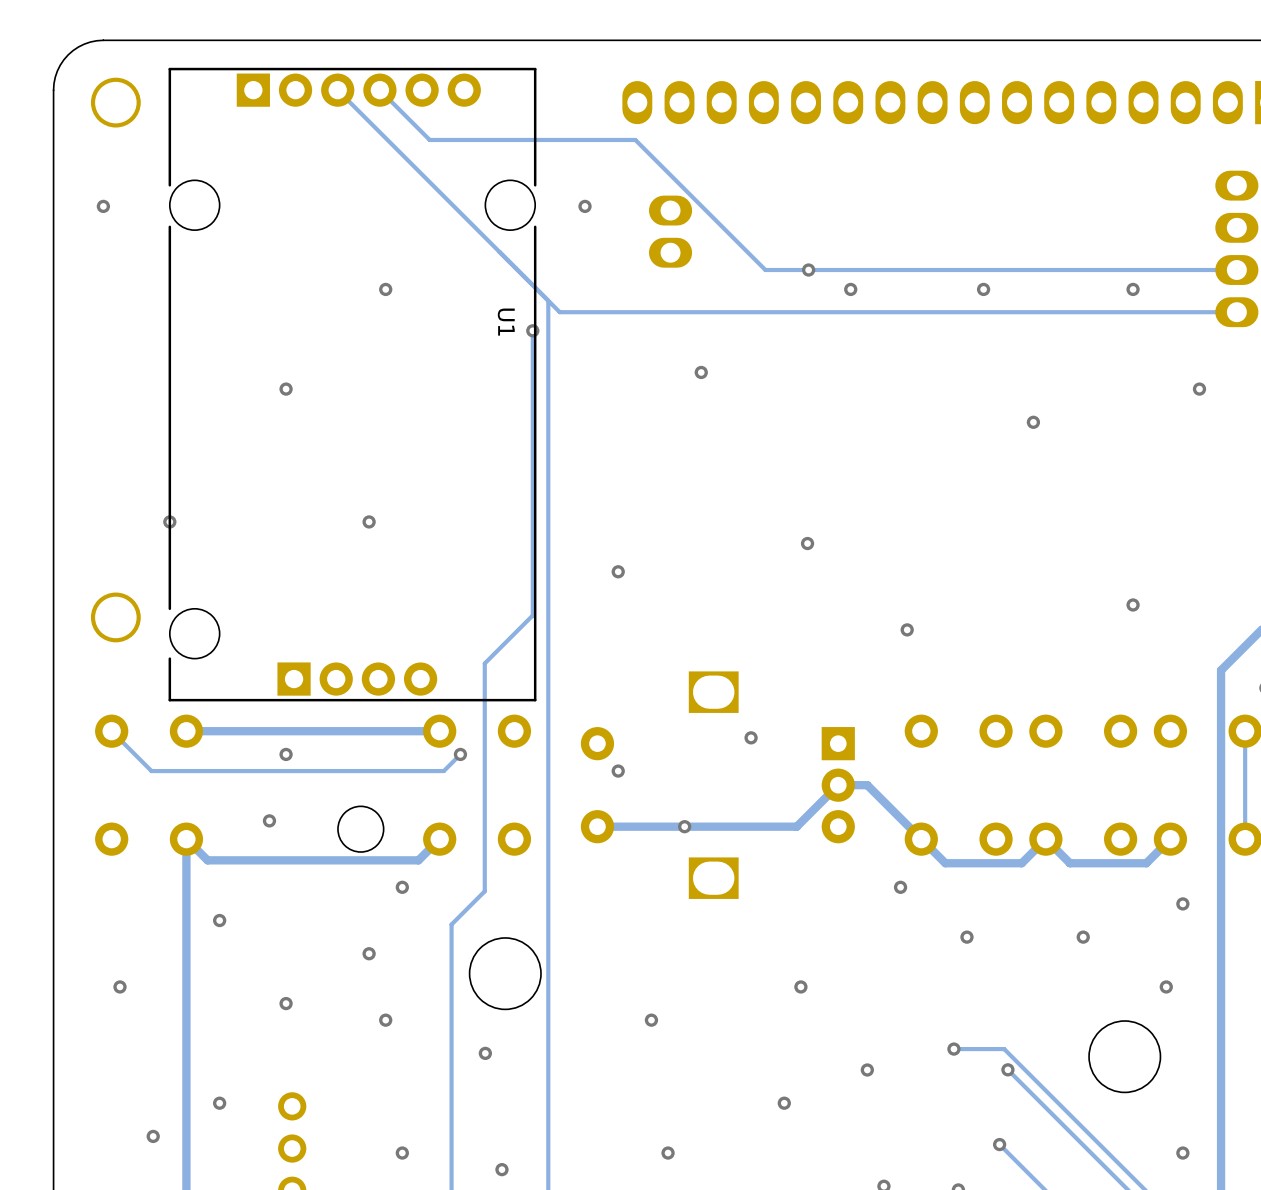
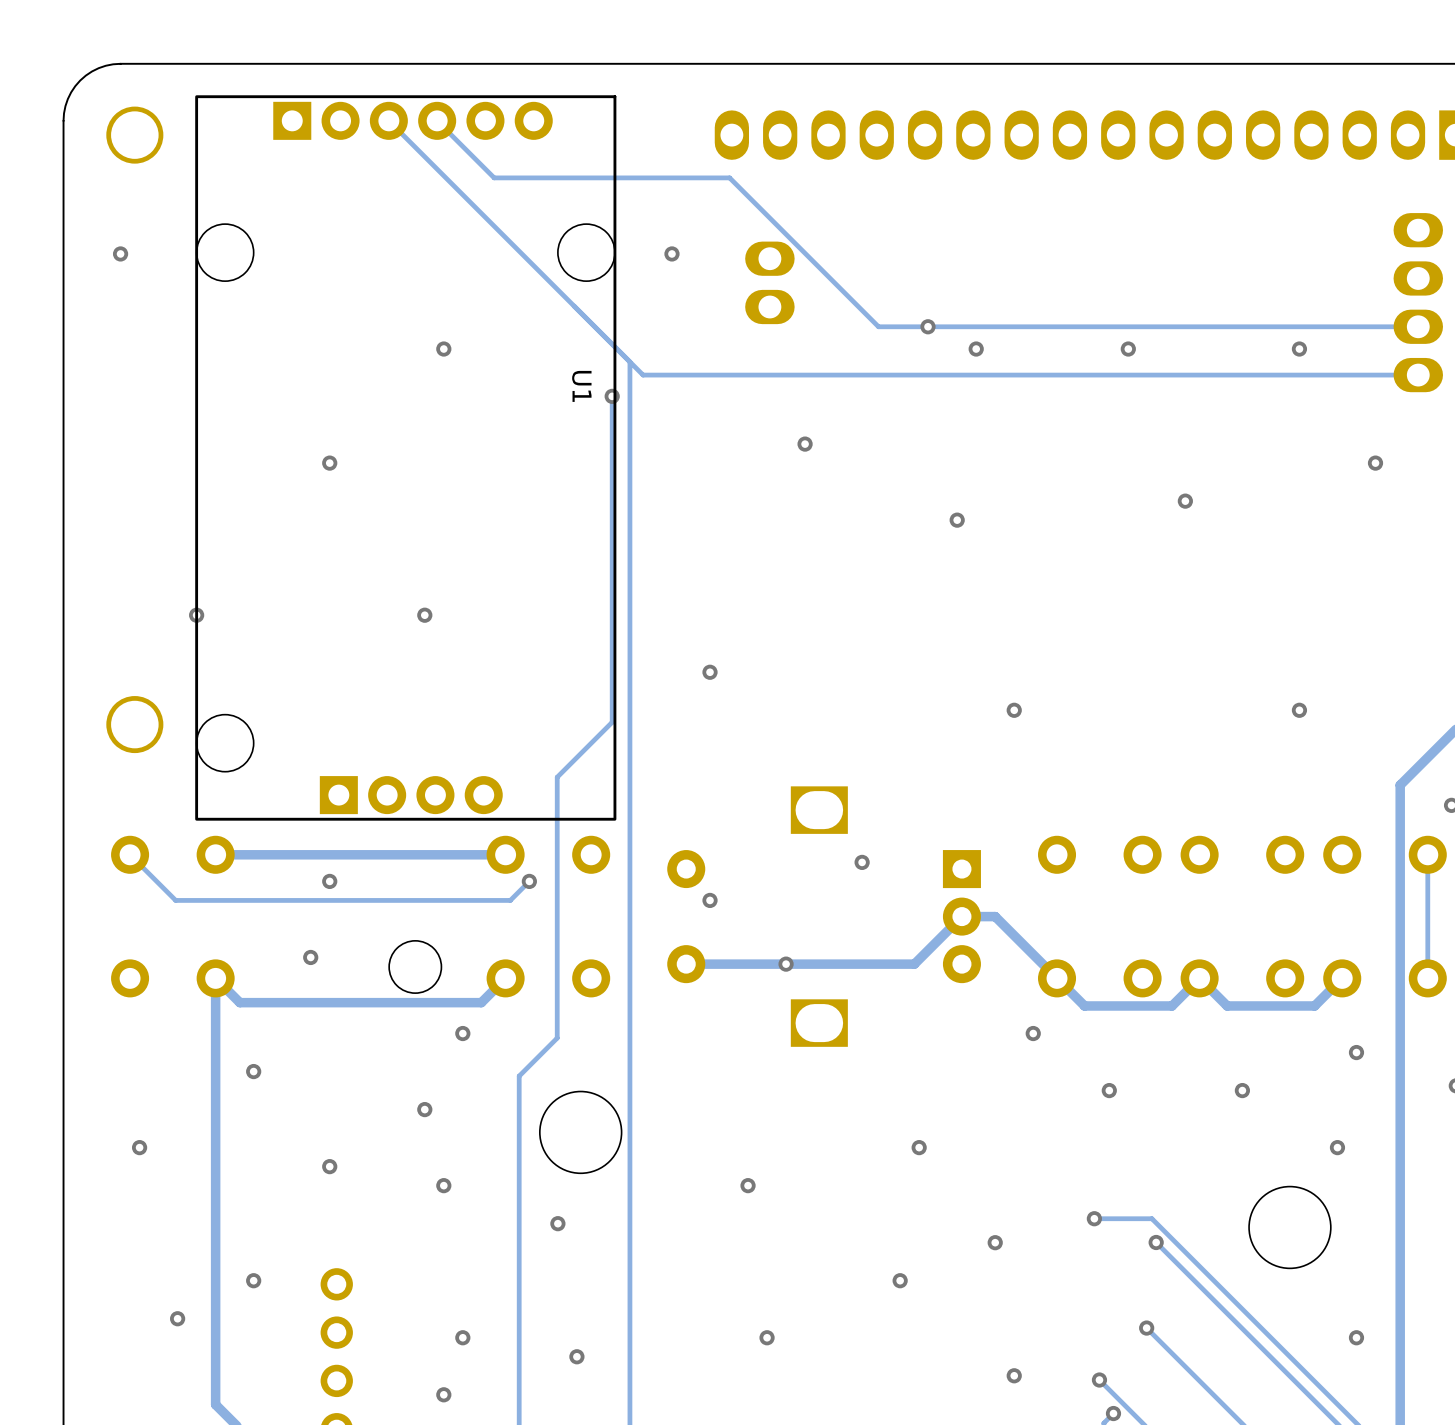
U1 footprint: [168, 67, 537, 702] -> [195, 95, 617, 821]
via: none -> (957, 520)
via: (807, 543) -> none
via position: (907, 629) -> (1014, 710)

